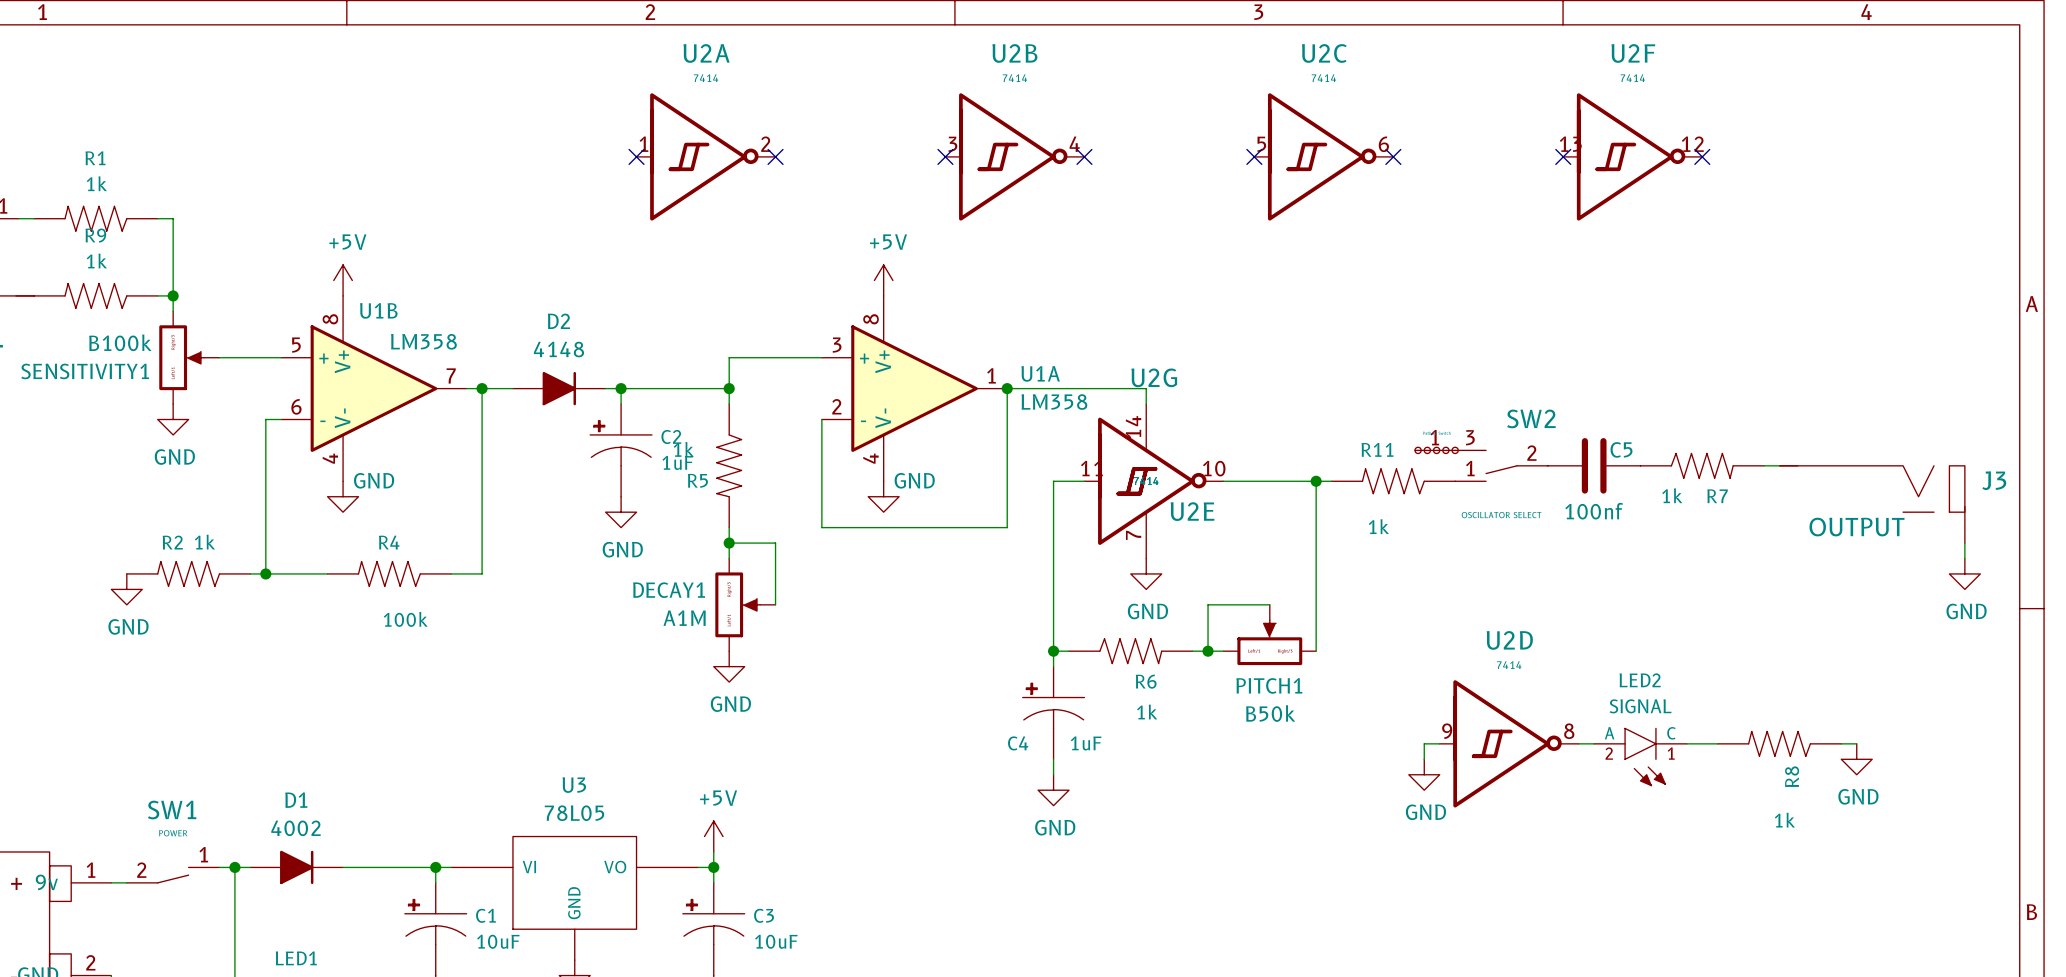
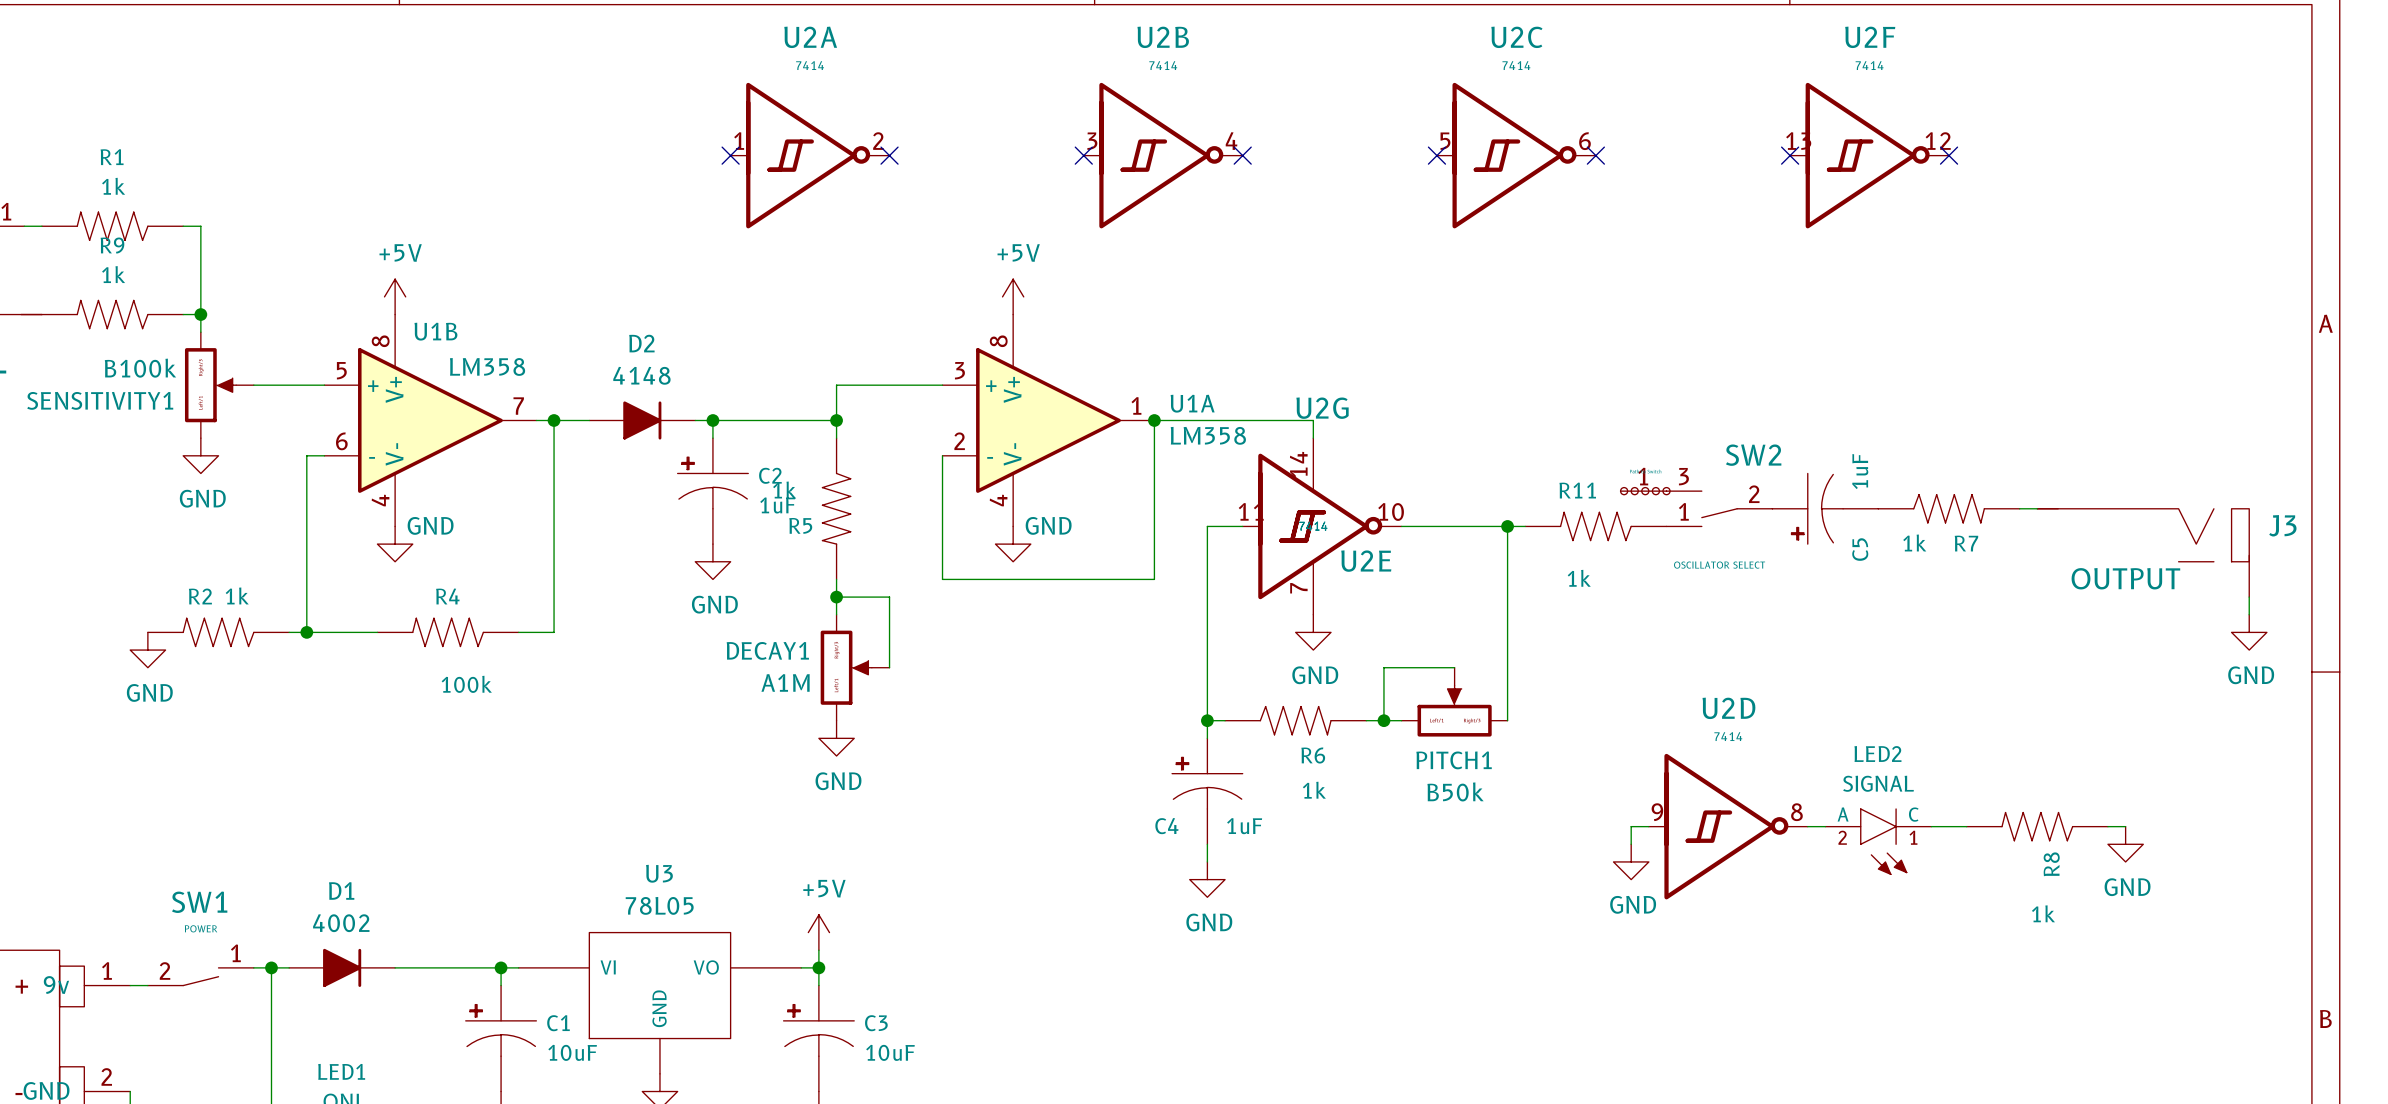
C5 symbol: [1547, 438, 1641, 494] -> [1772, 473, 1879, 545]
C5 name position: C5 (1621, 449) -> C5 (1860, 549)
C5 value: 100nf (1594, 511) -> 1uF (1860, 471)

